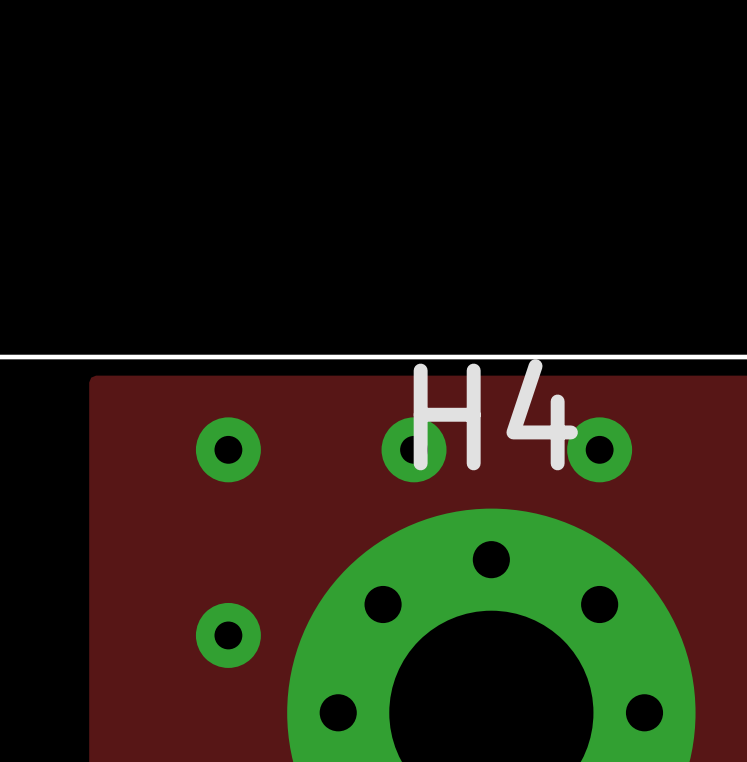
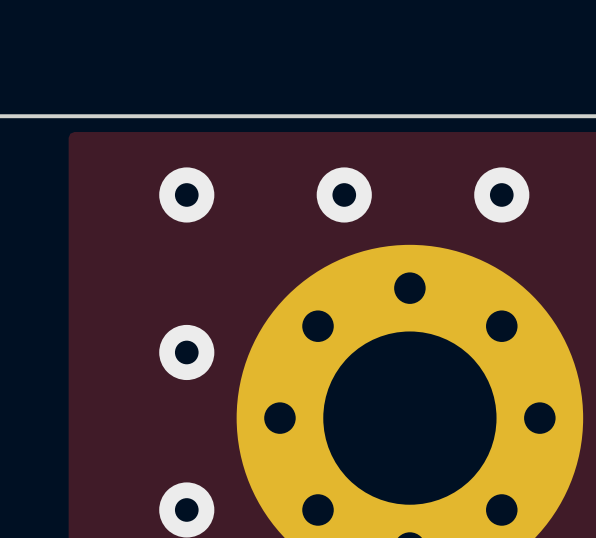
H4 name: H4 (495, 414) -> none

